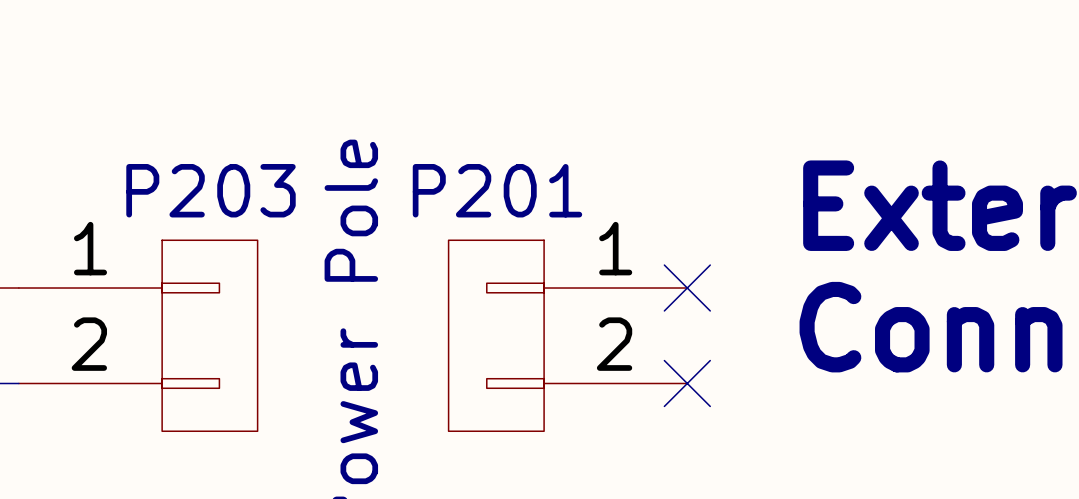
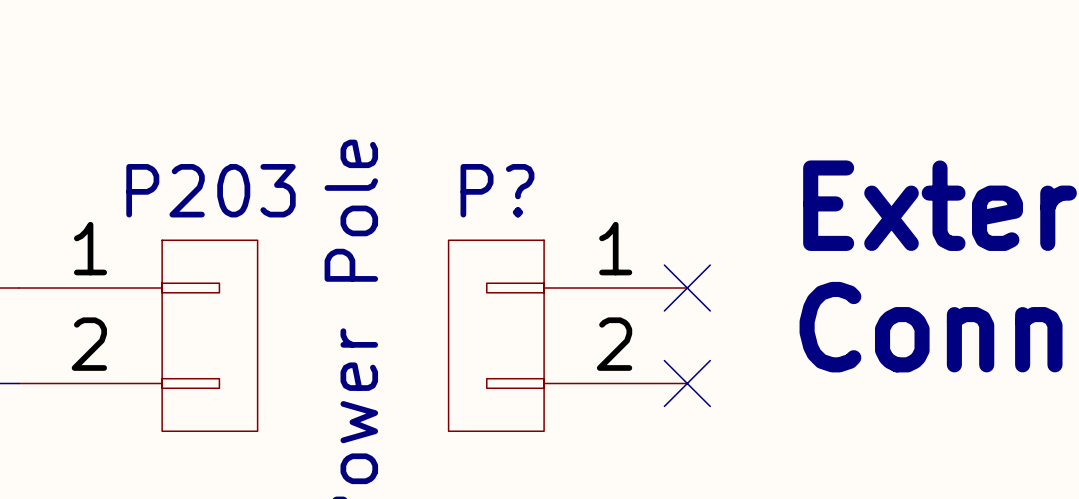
P201 name: P201 (497, 190) -> P? (497, 190)

